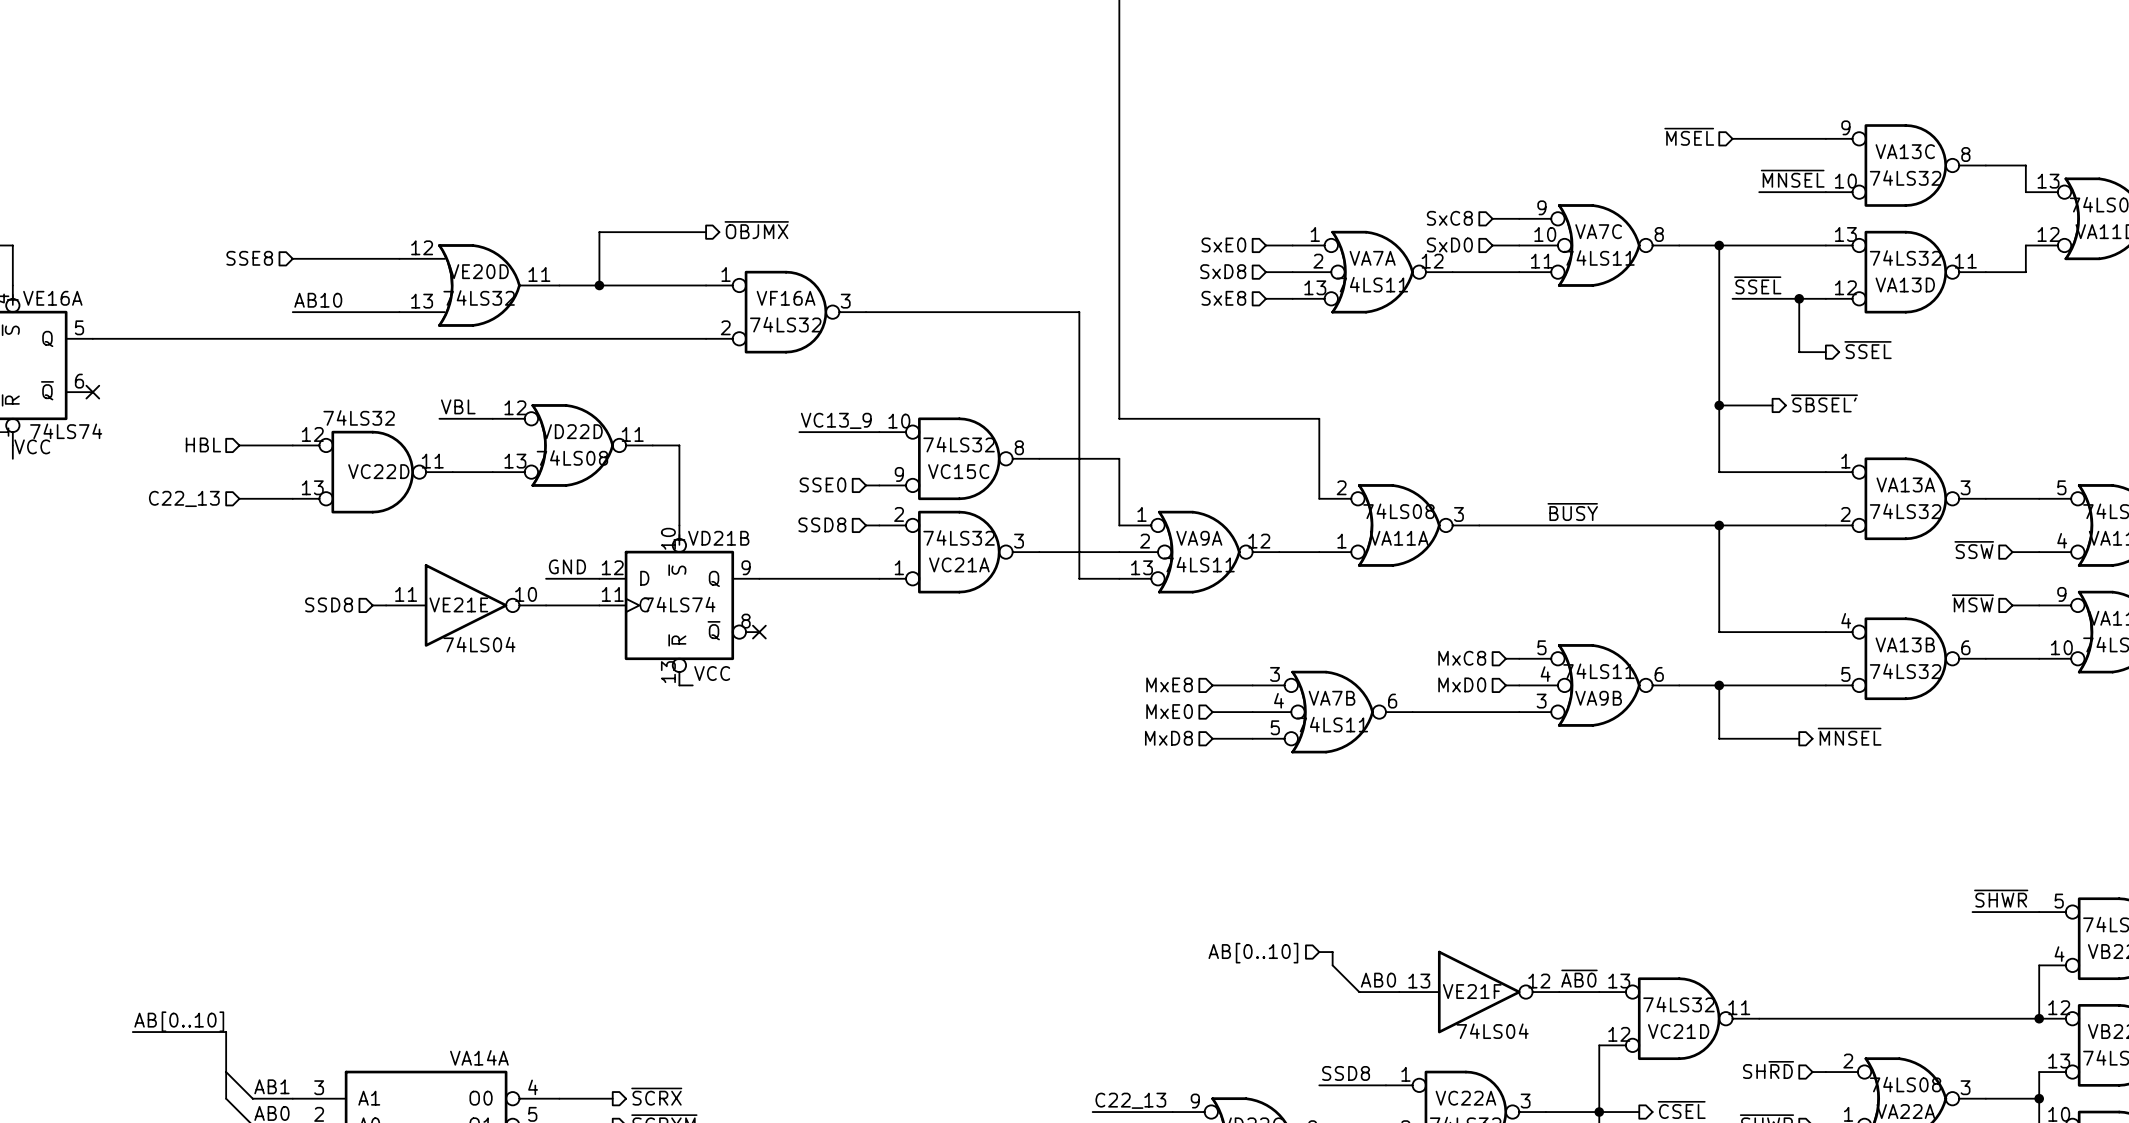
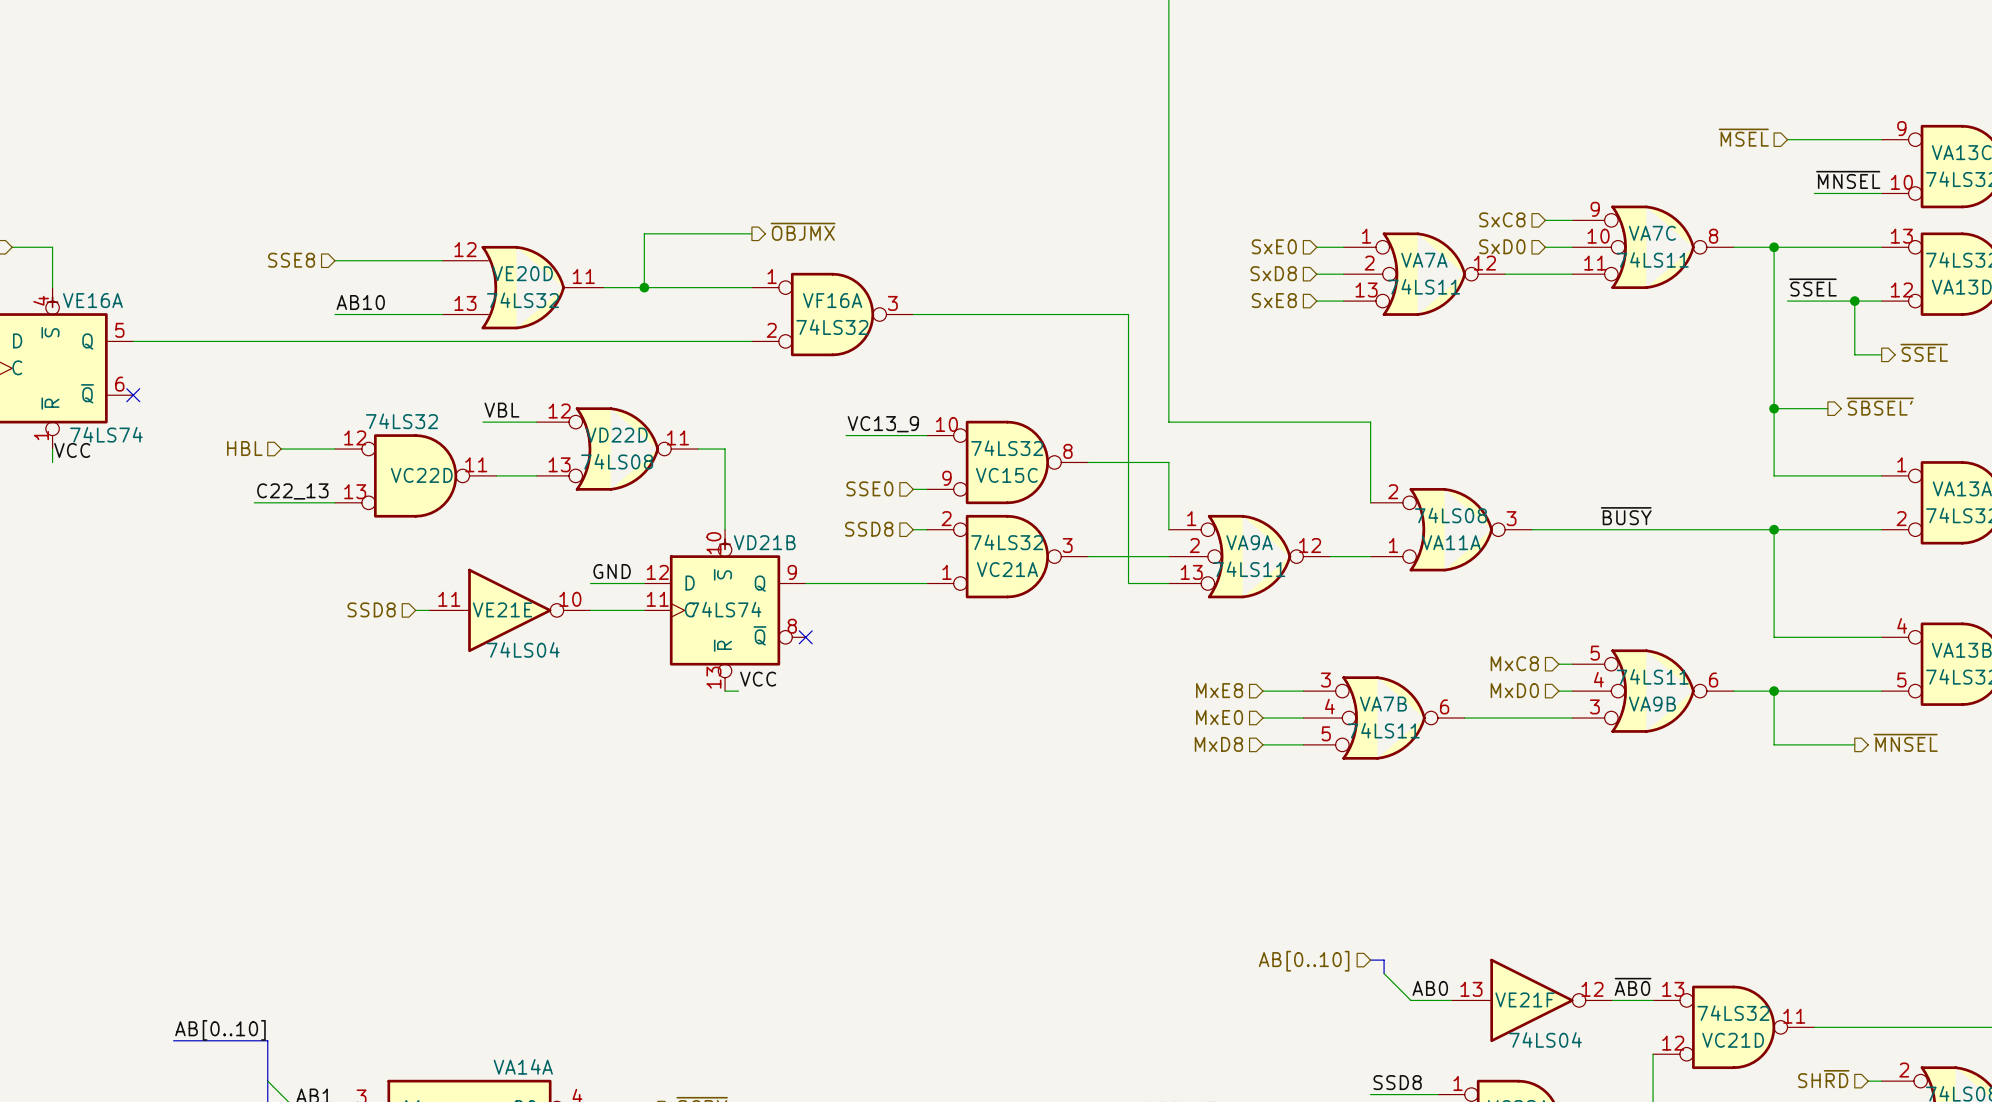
label: none -> C22_13 (292, 491)
hierarchical label: C22_13 (184, 498) -> none
wire: none -> (254, 502) (281, 502)

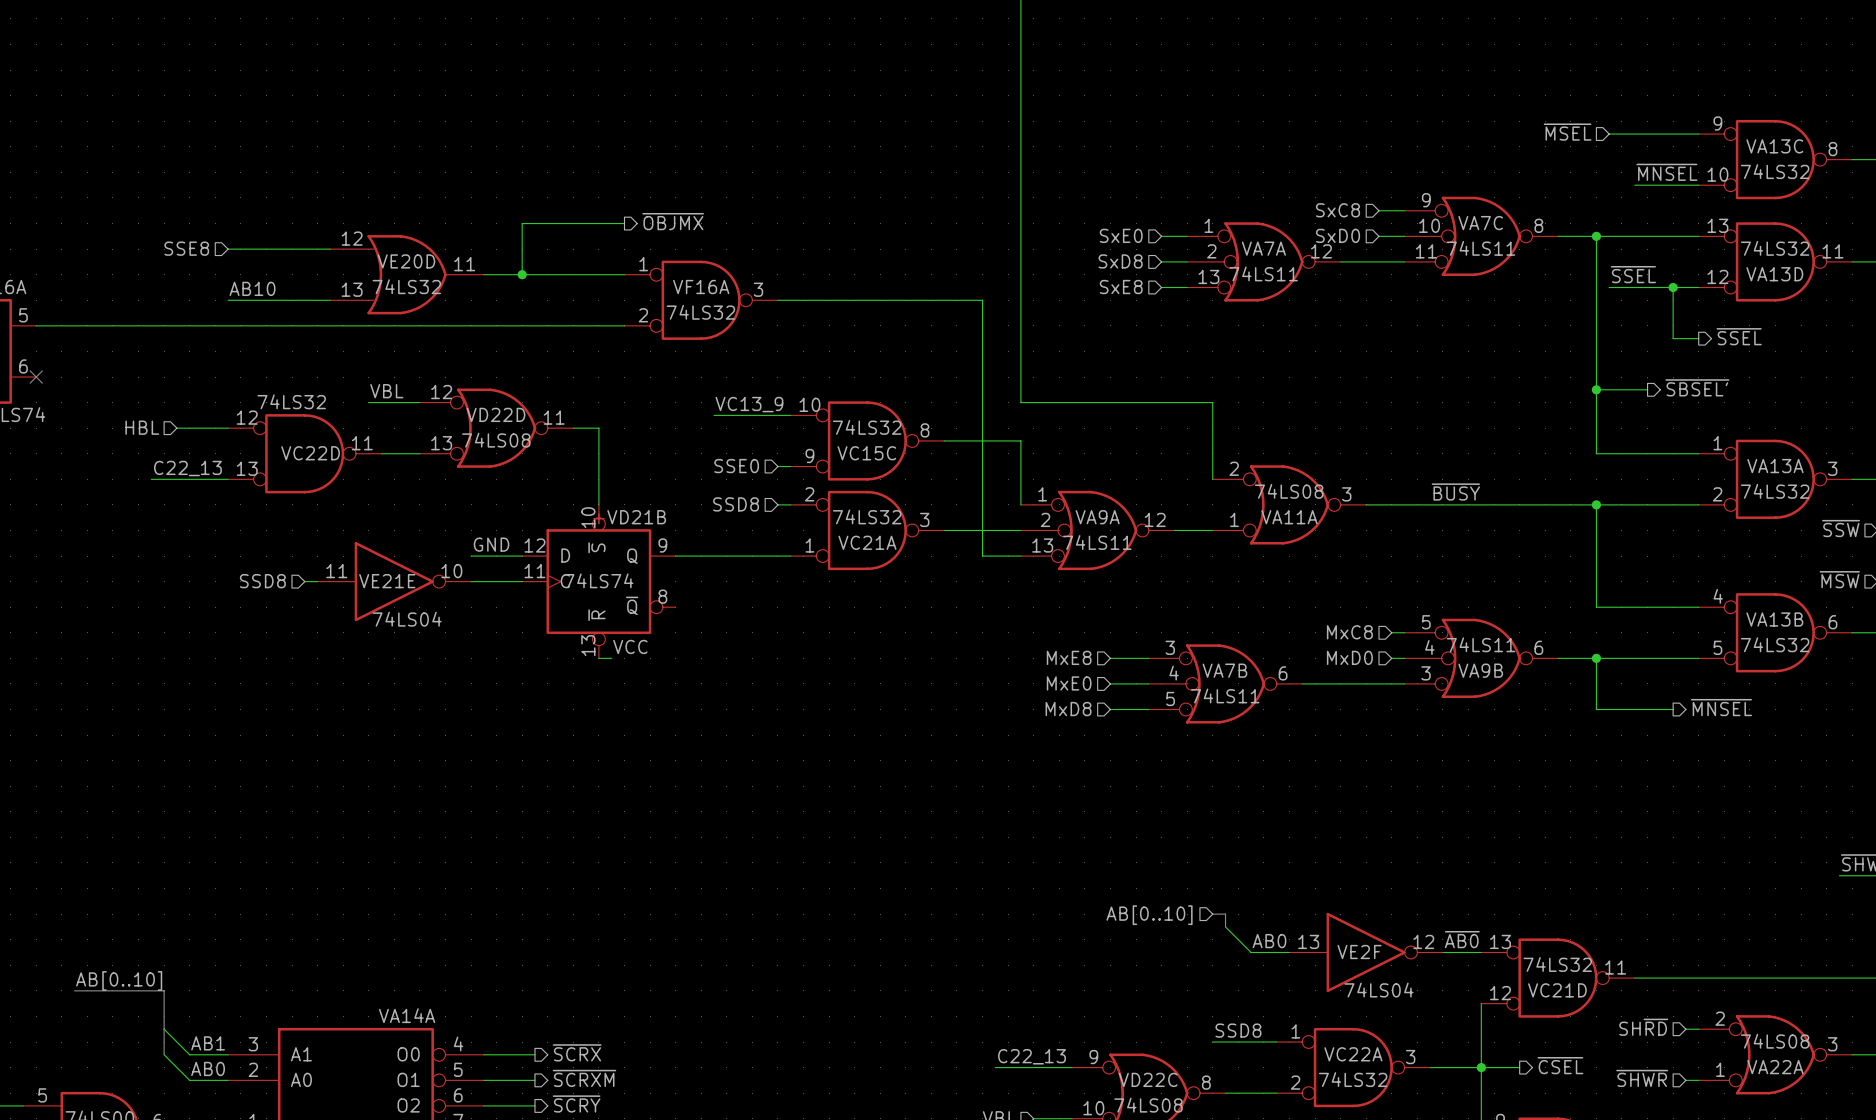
no-connect mark: (805, 637) -> none
VE21F name: VE21F (1524, 999) -> VE2F (1359, 952)

